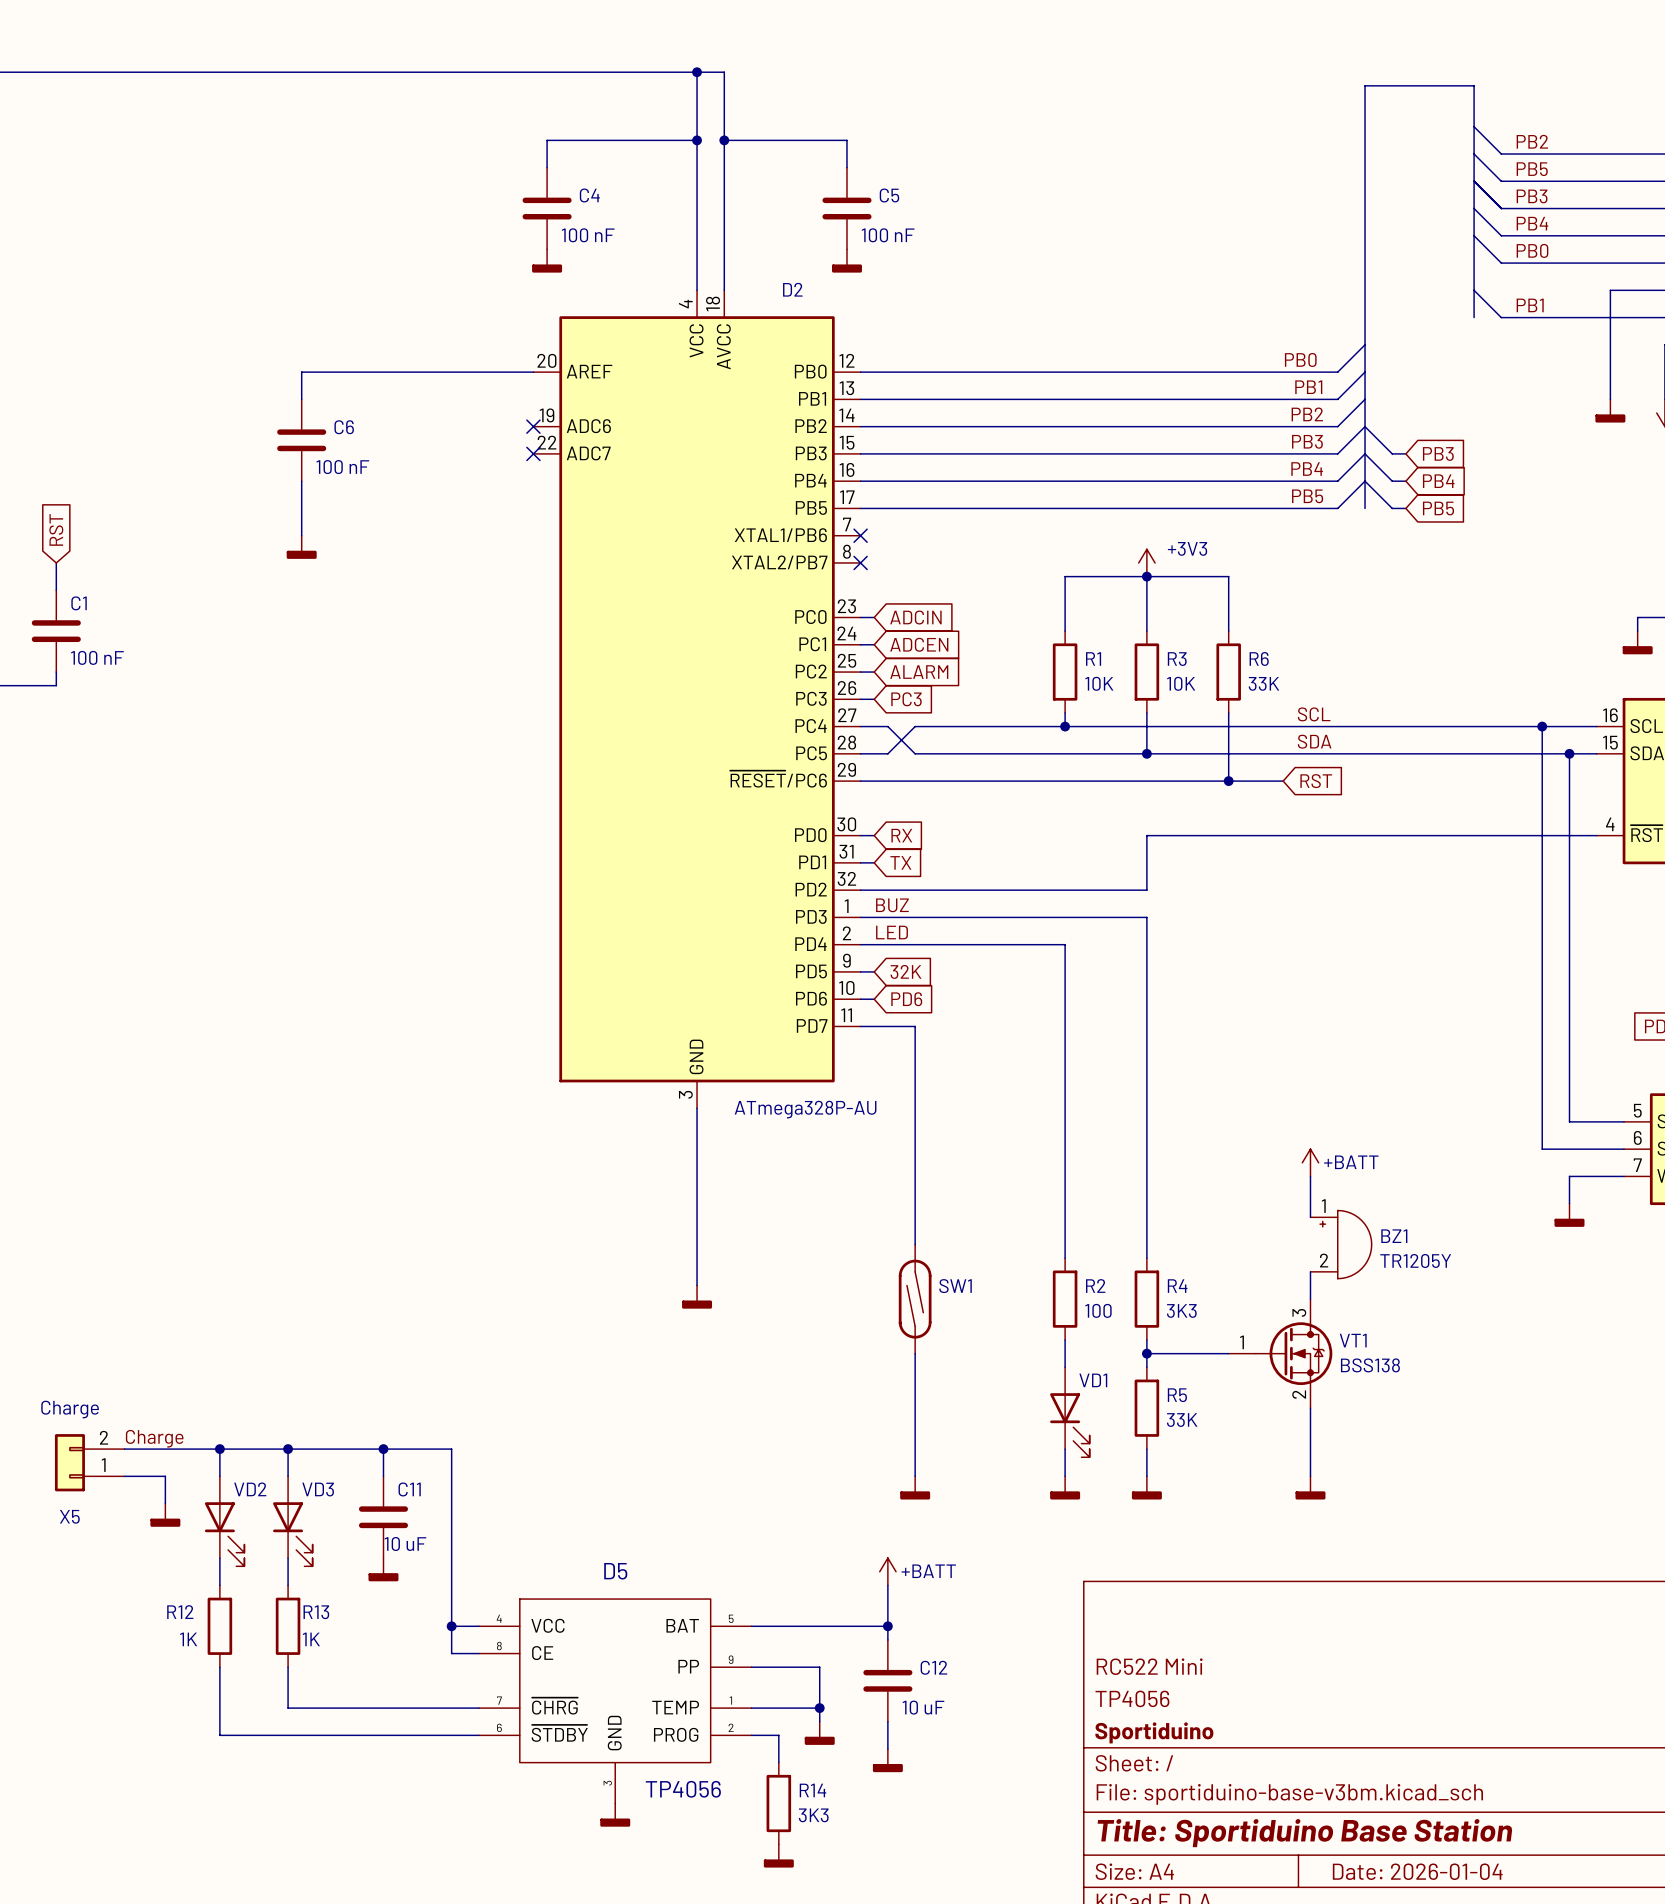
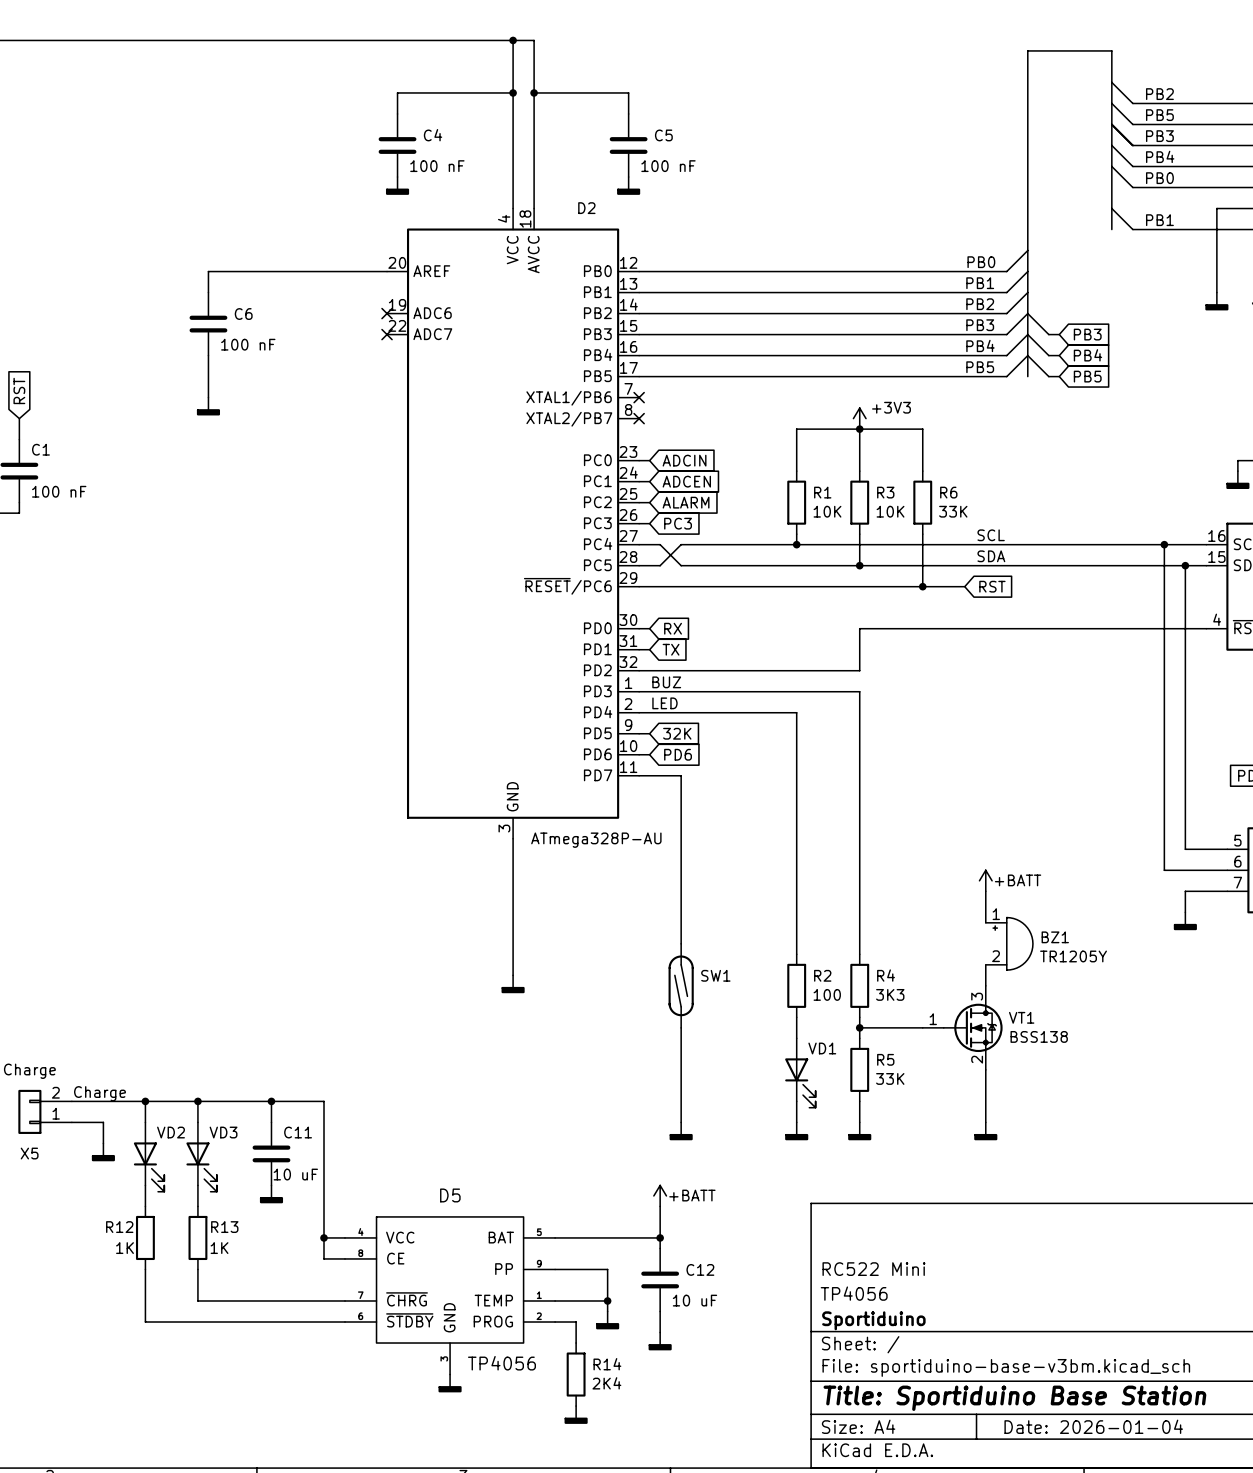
R14 value: 3K3 (813, 1815) -> 2K4 (606, 1383)

